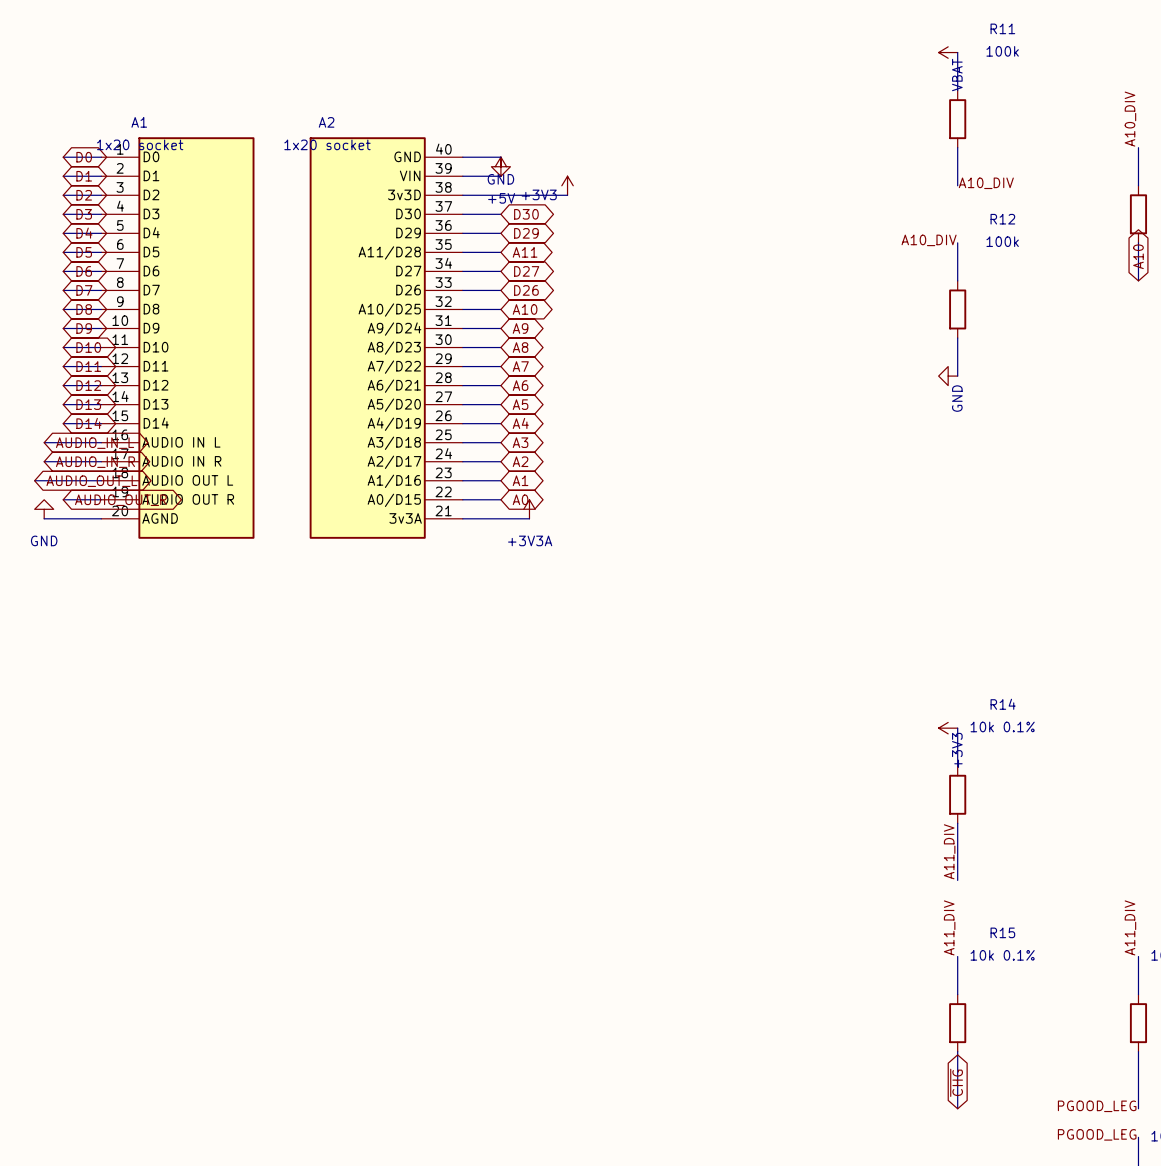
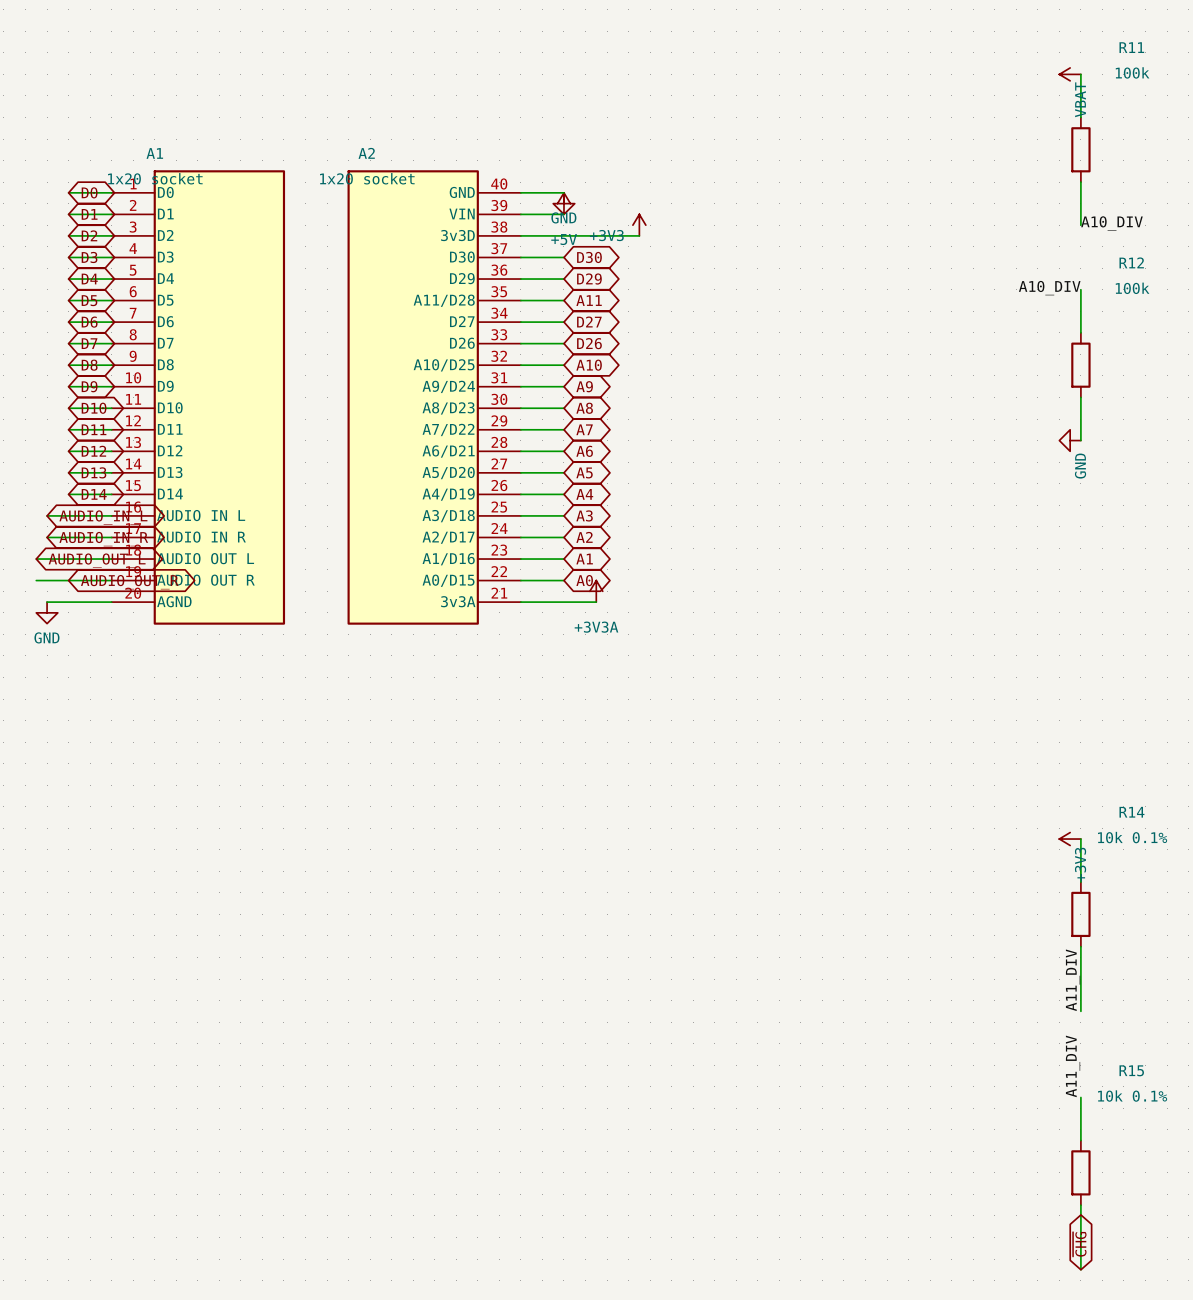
wire: none -> (36, 580) (68, 580)
power symbol rotation: 0° (44, 509) -> 180° (47, 612)
power symbol position: GND (44, 509) -> GND (47, 612)

